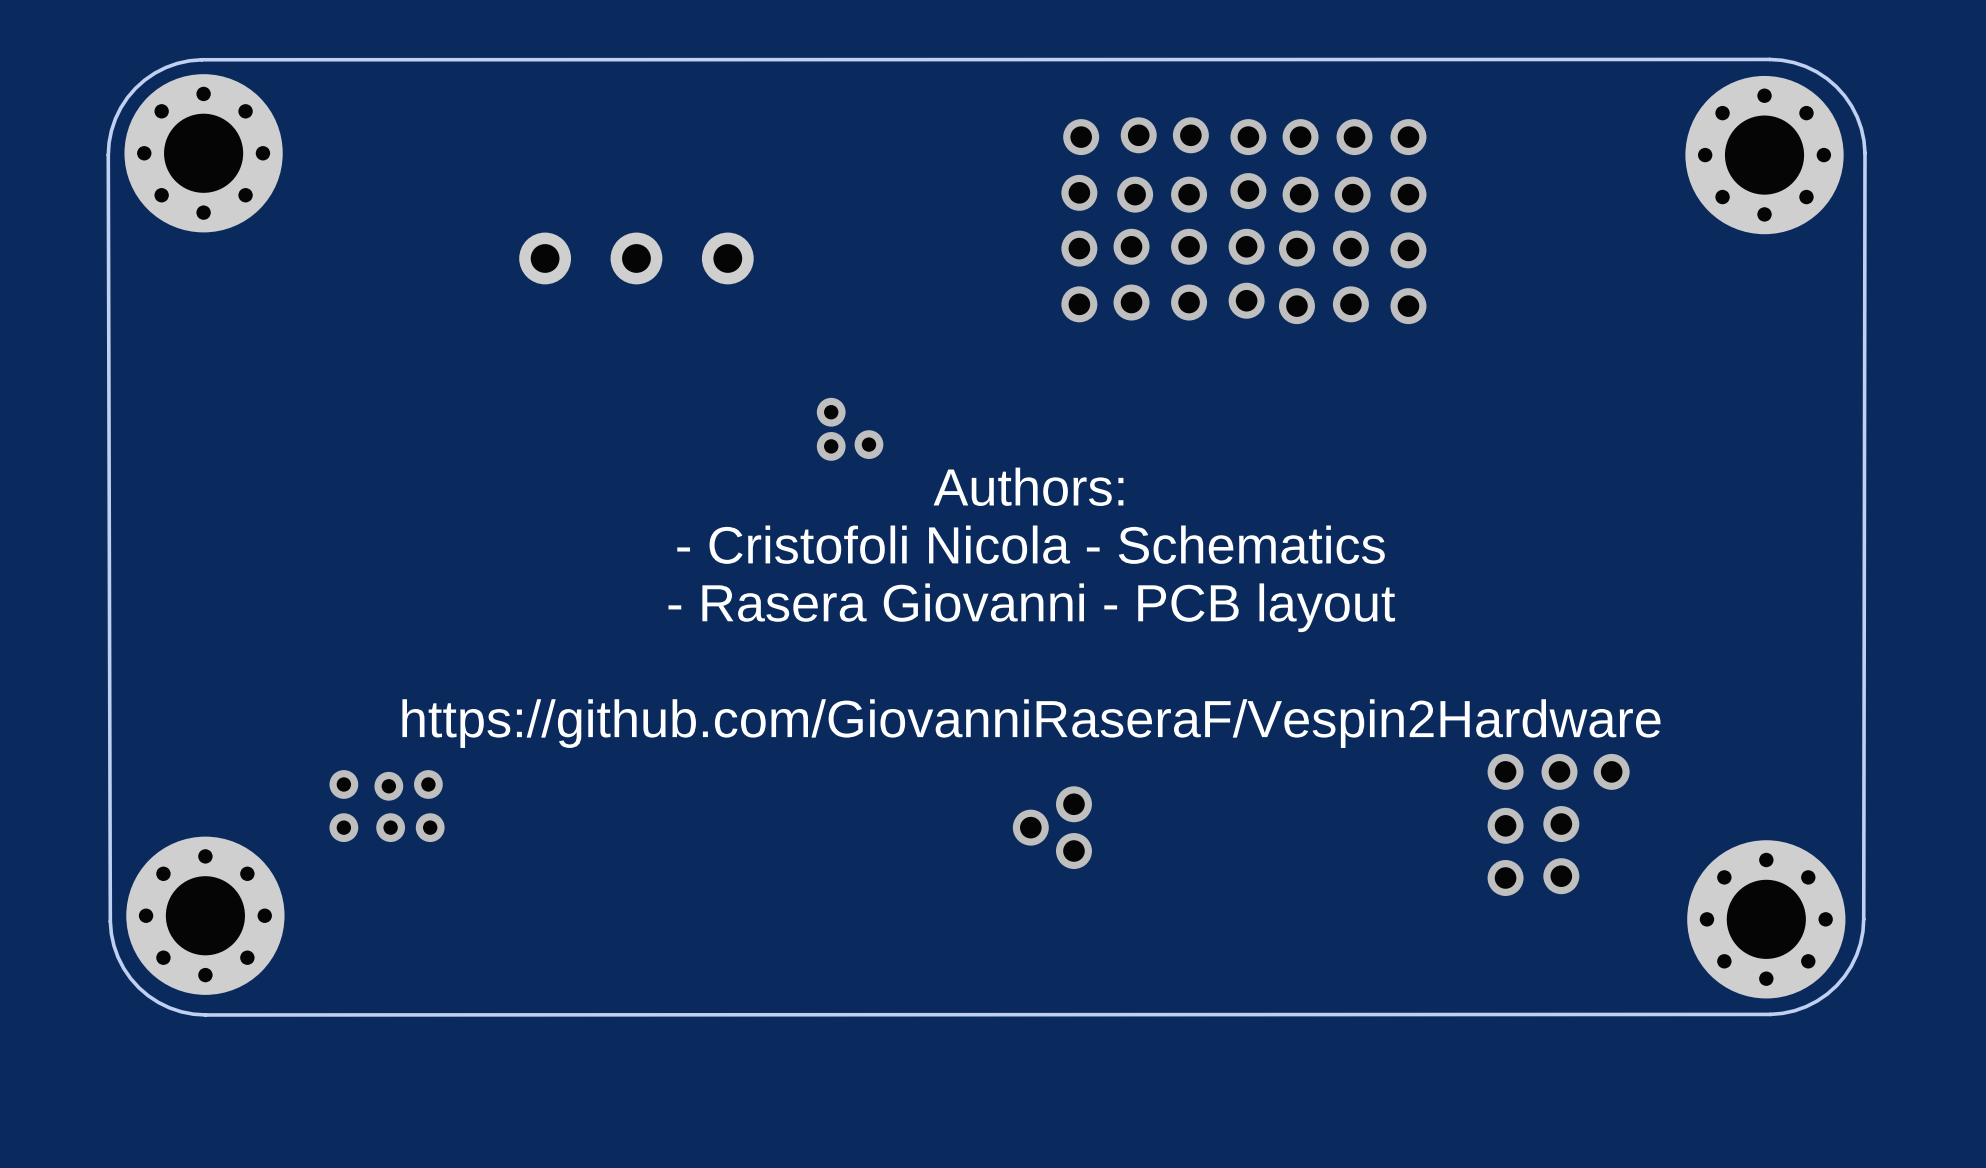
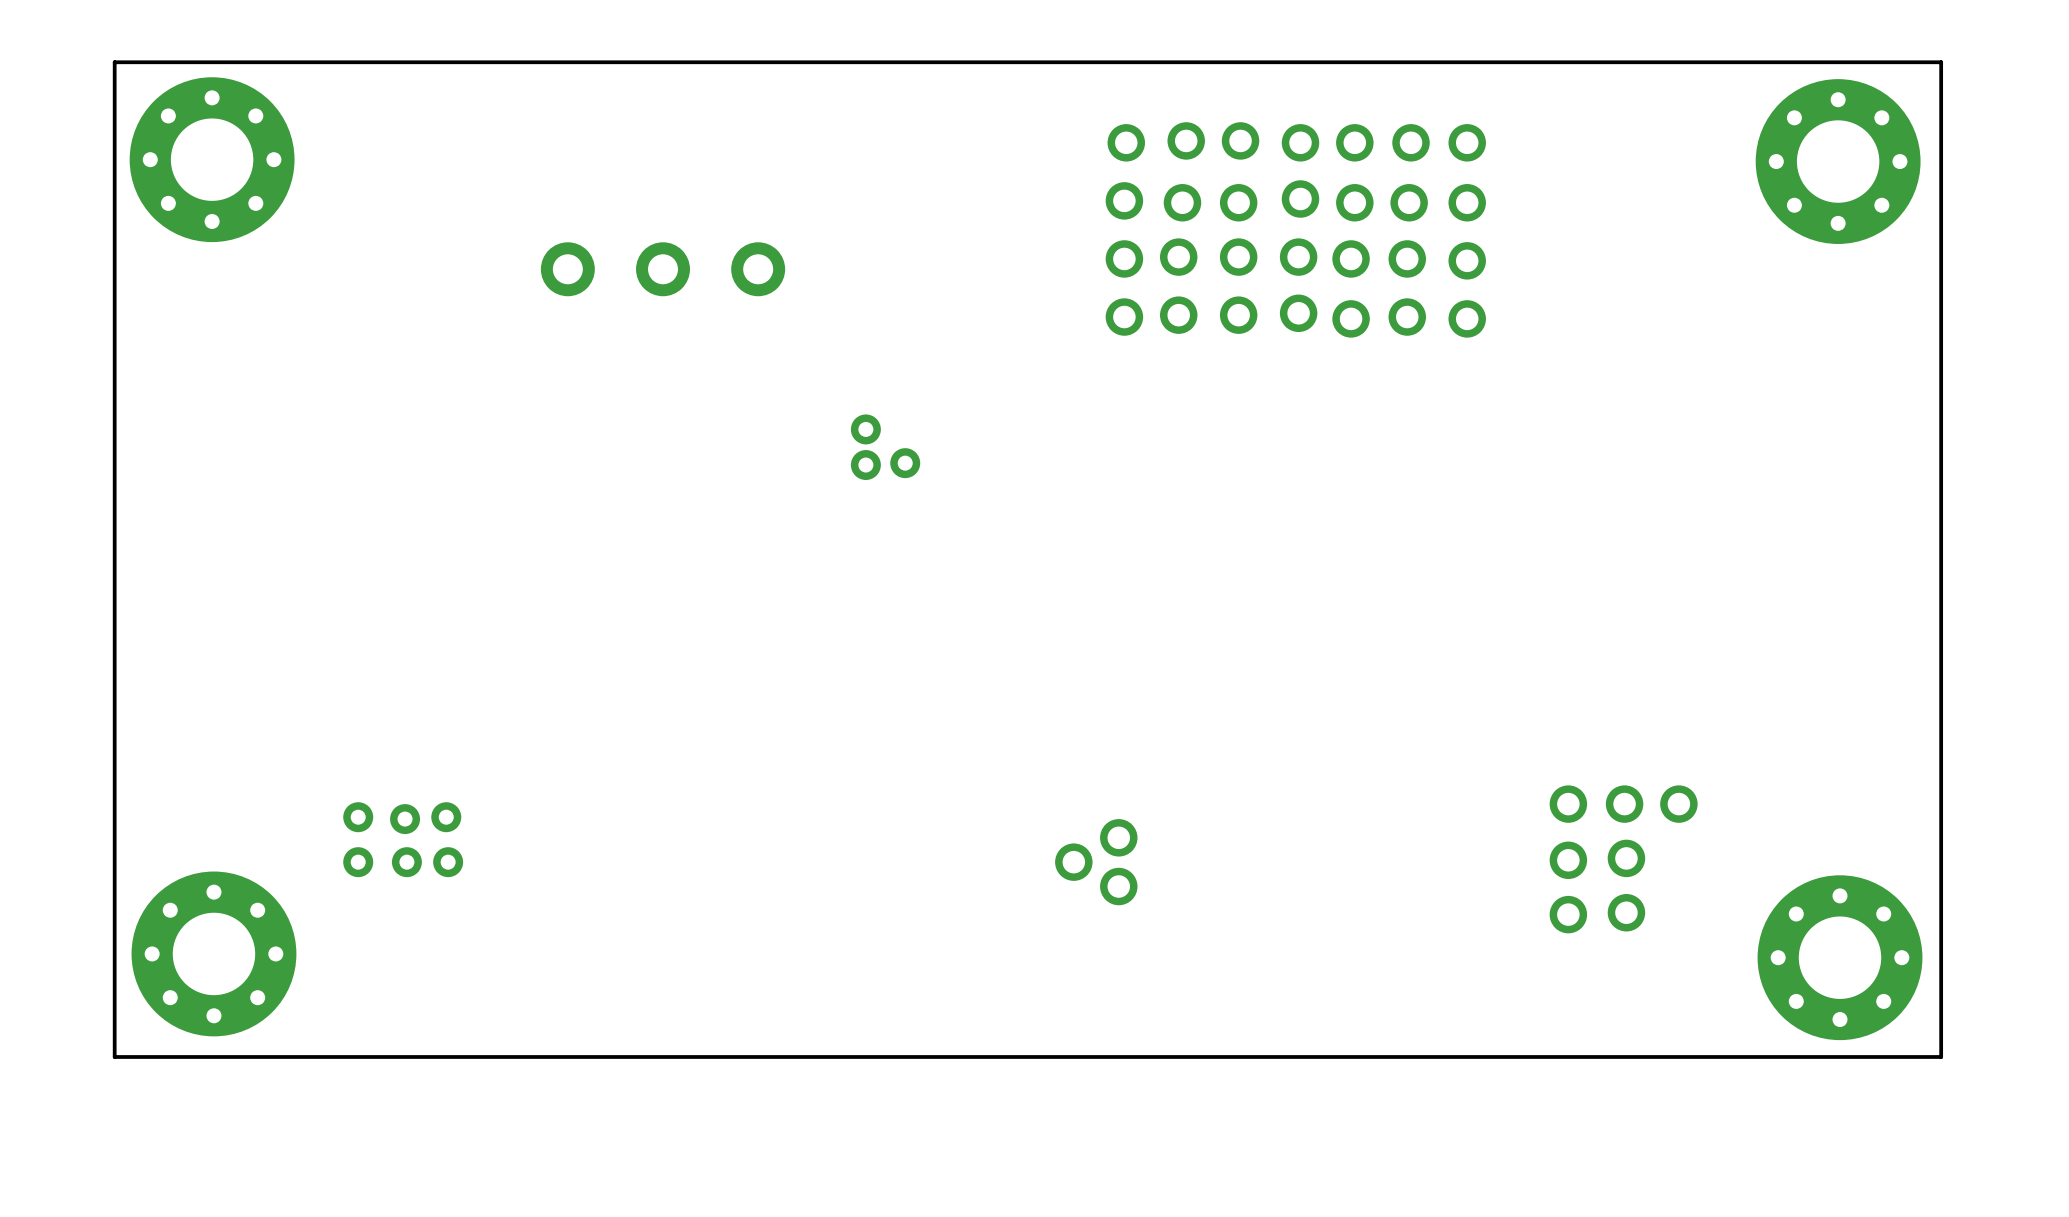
board edge: (1769, 59) (201, 59) (177, 63) (154, 73) (135, 88) (120, 107) (111, 130) (108, 155) (110, 921) (113, 945) (123, 968) (138, 987) (158, 1002) (181, 1011) (205, 1014) (1770, 1014) (1794, 1010) (1817, 1001) (1836, 985) (1851, 966) (1860, 943) (1863, 919) (1864, 152) (1861, 128) (1857, 117) (1844, 95) (1836, 86) (1827, 78) (1805, 66) (1781, 60) (1769, 59) -> (1941, 62) (1941, 1056) (114, 1056) (114, 62) (1941, 62)
text: Authors: (1028, 486) -> none
text: - Cristofoli Nicola - Schematics (1031, 544) -> none
text: - Rasera Giovanni - PCB layout (1031, 607) -> none
text: https://github.com/GiovanniRaseraF/Vespin2Hardware (1031, 723) -> none

